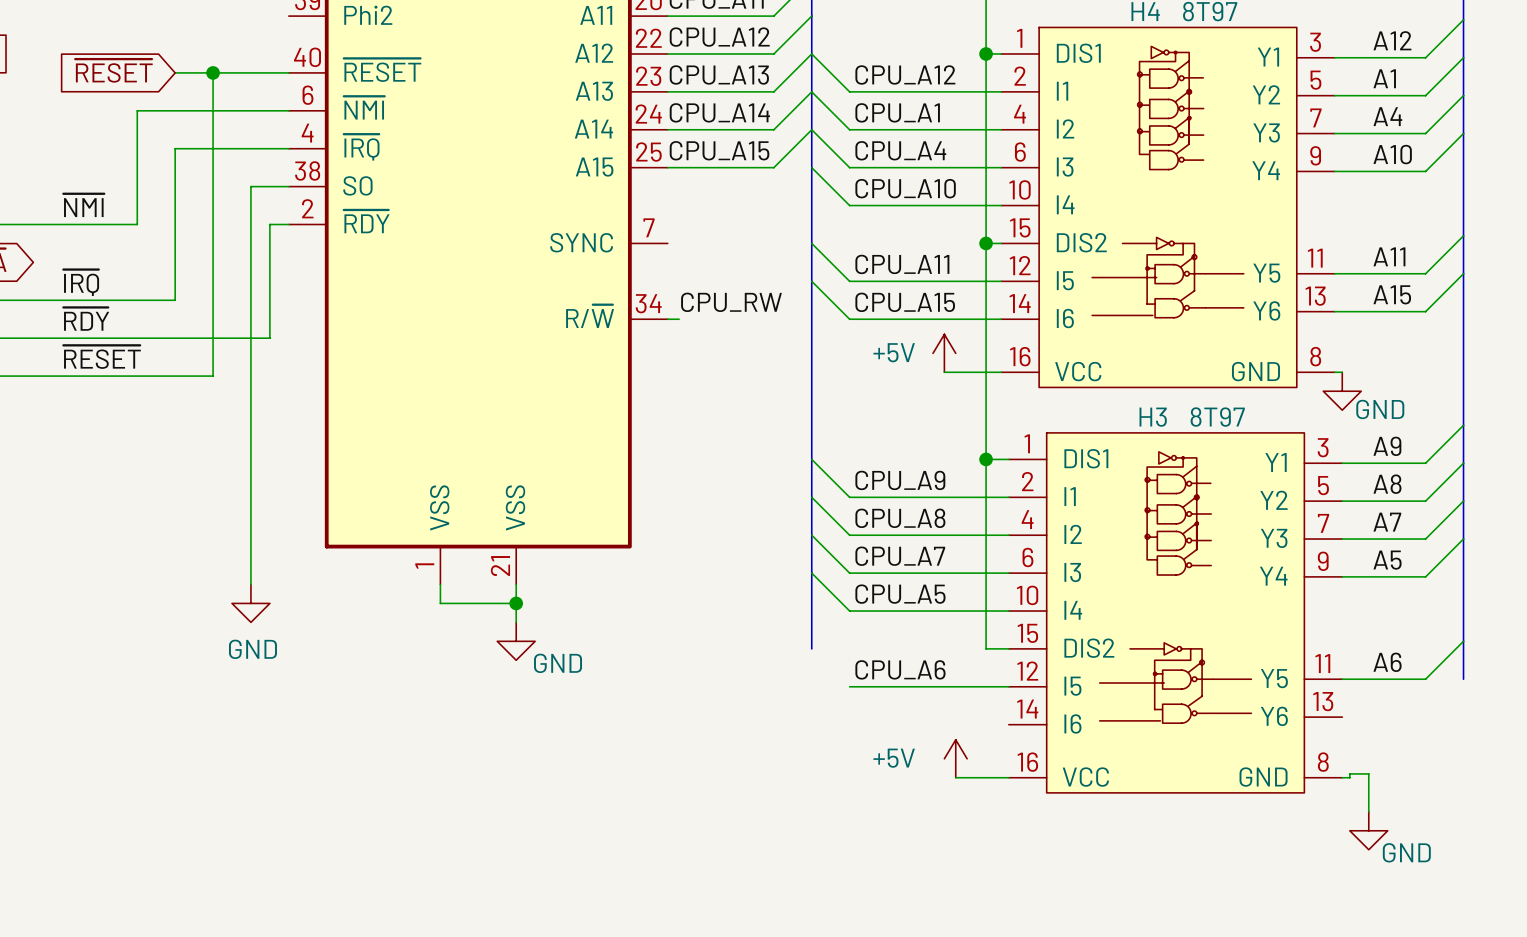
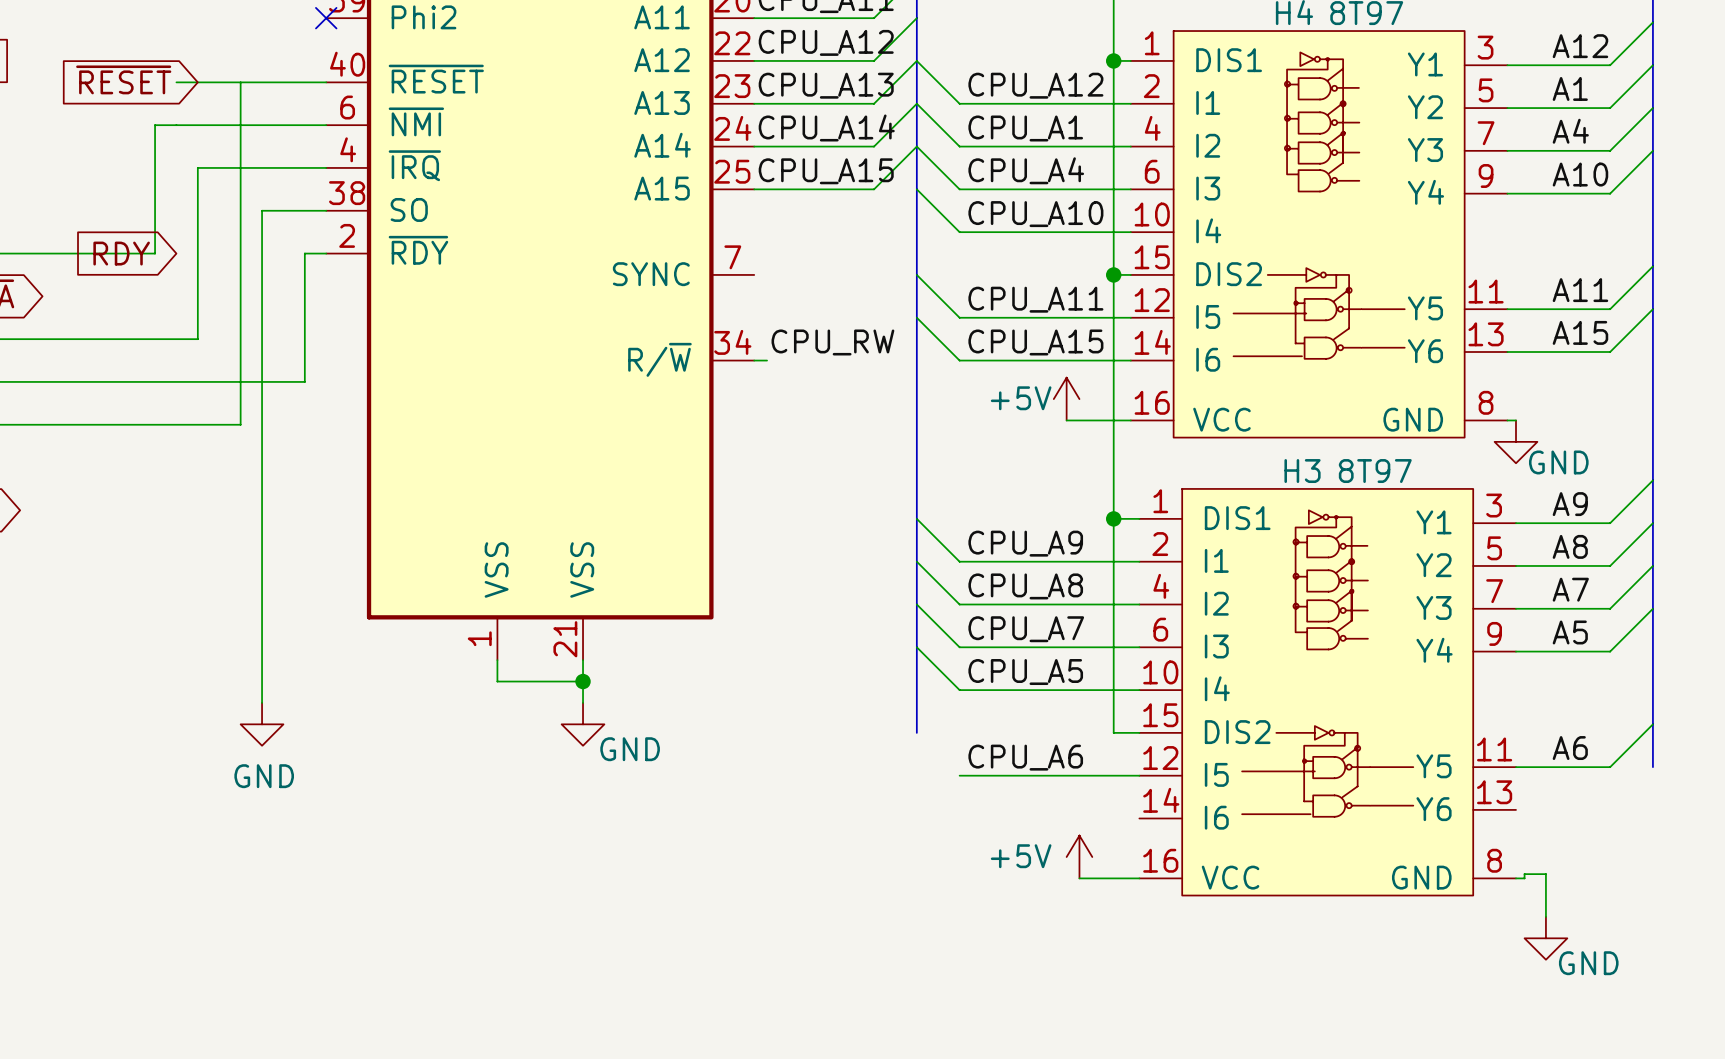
no-connect mark: none -> (326, 18)
wire: none -> (176, 82) (197, 82)
junction: (213, 72) -> none
wire: (250, 186) (250, 584) -> (283, 210) (262, 210) (262, 702)
label: ~{NMI} (83, 205) -> none
global label: none -> RDY (121, 253)
label: ~{IRQ} (81, 282) -> none
label: ~{RDY} (86, 319) -> none
label: ~{RESET} (102, 357) -> none
power symbol position: GND (250, 603) -> GND (262, 724)

